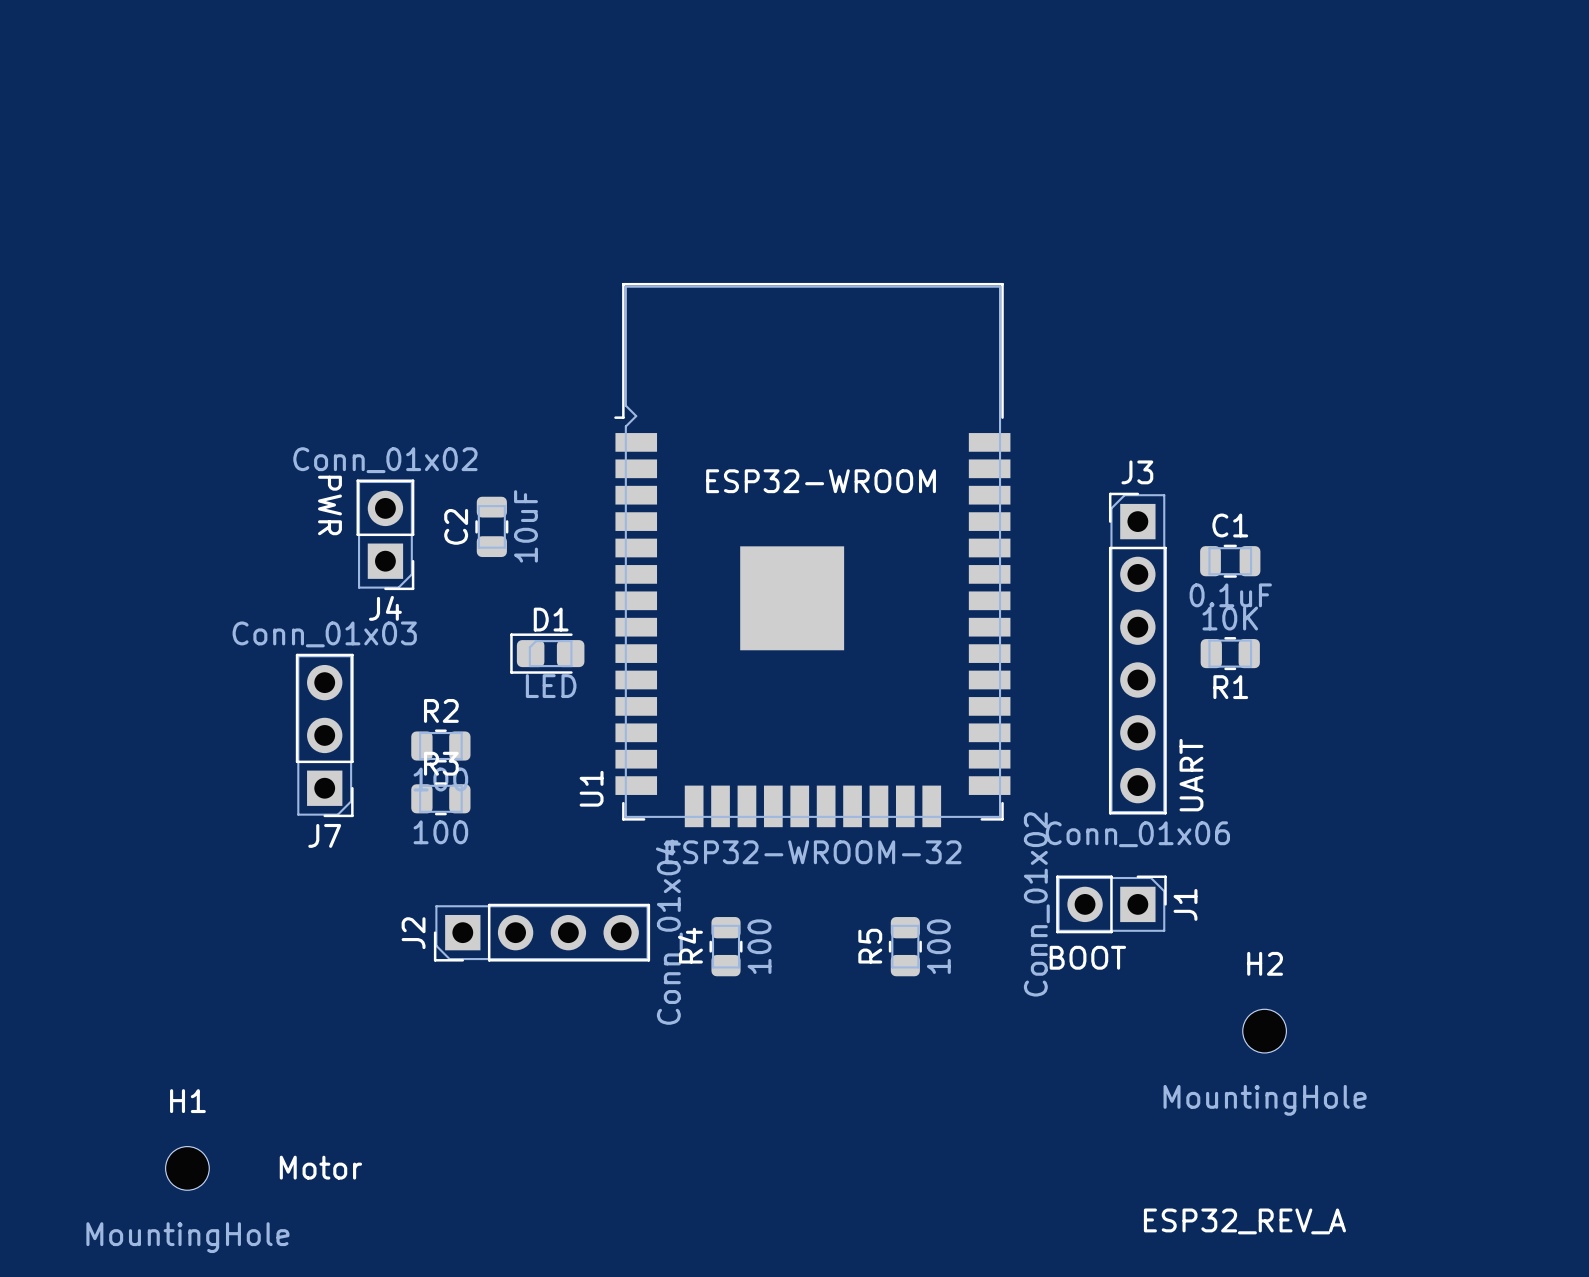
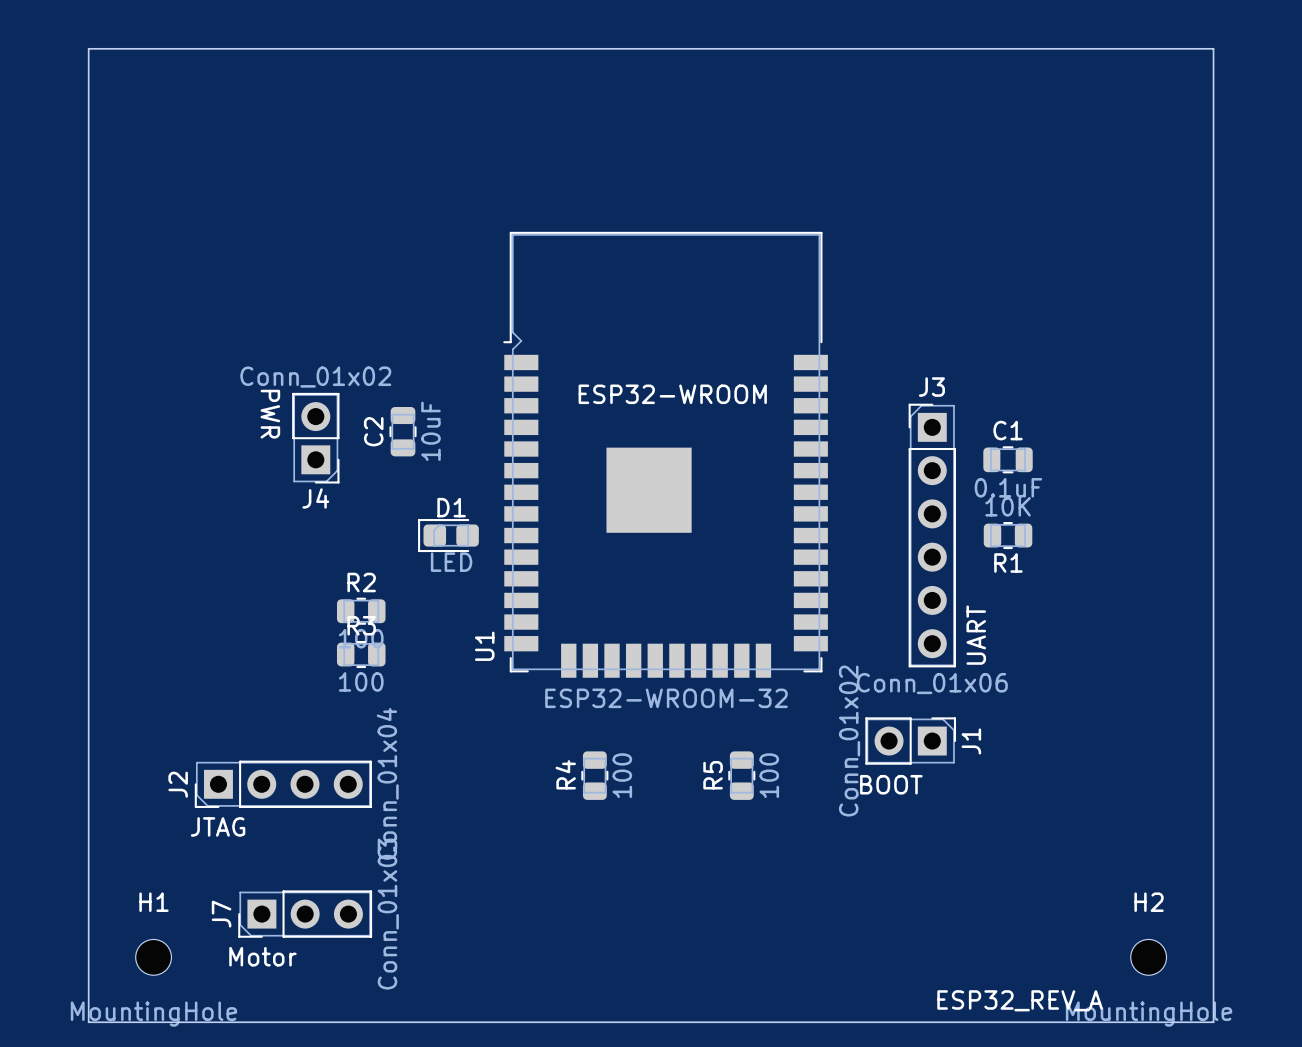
board edge: none -> (88, 48) (1213, 48) (1213, 1022) (88, 1022) (88, 48)
J7 rotation: 0° (324, 735) -> 90° clockwise (305, 914)
J7 position: (324, 735) -> (305, 914)
J2 position: (541, 932) -> (283, 784)
text: none -> JTAG (218, 826)
H2 position: (1264, 1031) -> (1148, 957)

